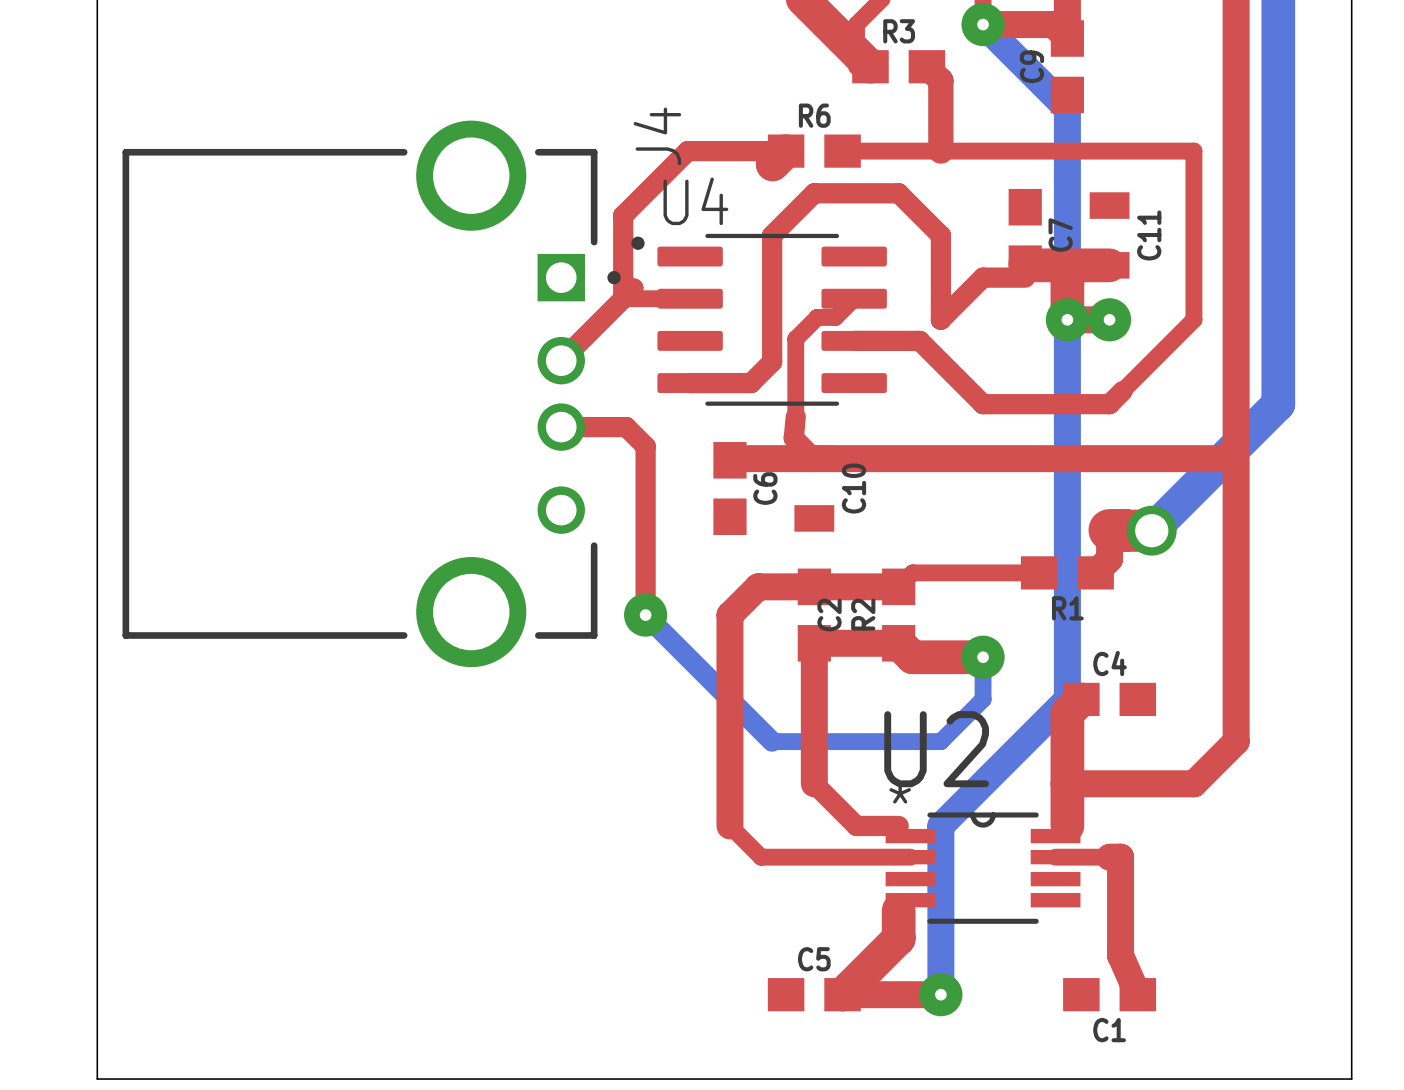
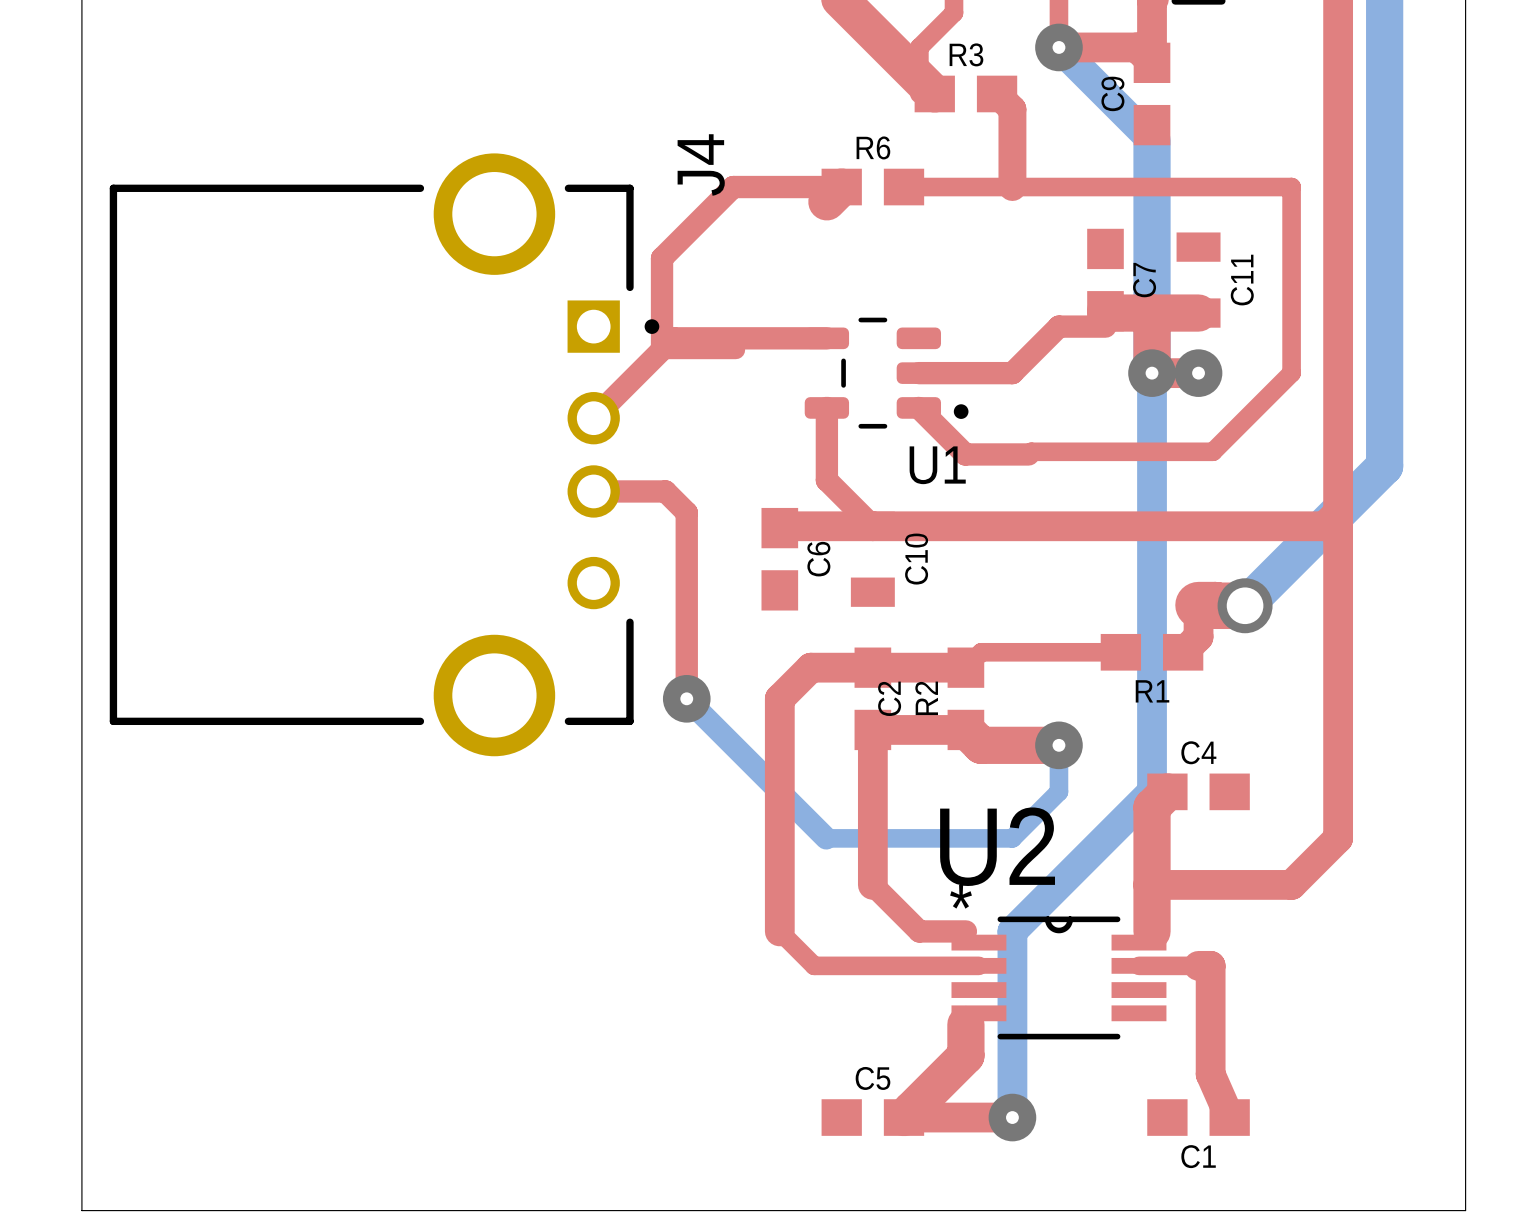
bottom track width: thin (1067, 108) (1067, 319) -> thick (1152, 140) (1152, 373)
top track: none -> (673, 338) (826, 338)
top track: (854, 298) (835, 317) (817, 317) (795, 339) (795, 416) (793, 438) -> (826, 407) (826, 480) (850, 503)
U4: (759, 319) -> none
U1: none -> (886, 373)
top track: (940, 319) (940, 235) (898, 193) (814, 193) (772, 235) (772, 361) (751, 383) (690, 383) -> (1012, 373) (918, 373)
top track: (854, 340) (919, 340) (983, 404) (1109, 404) (1122, 391) -> (918, 407) (965, 454) (1028, 454) (1031, 451) (1212, 451)

